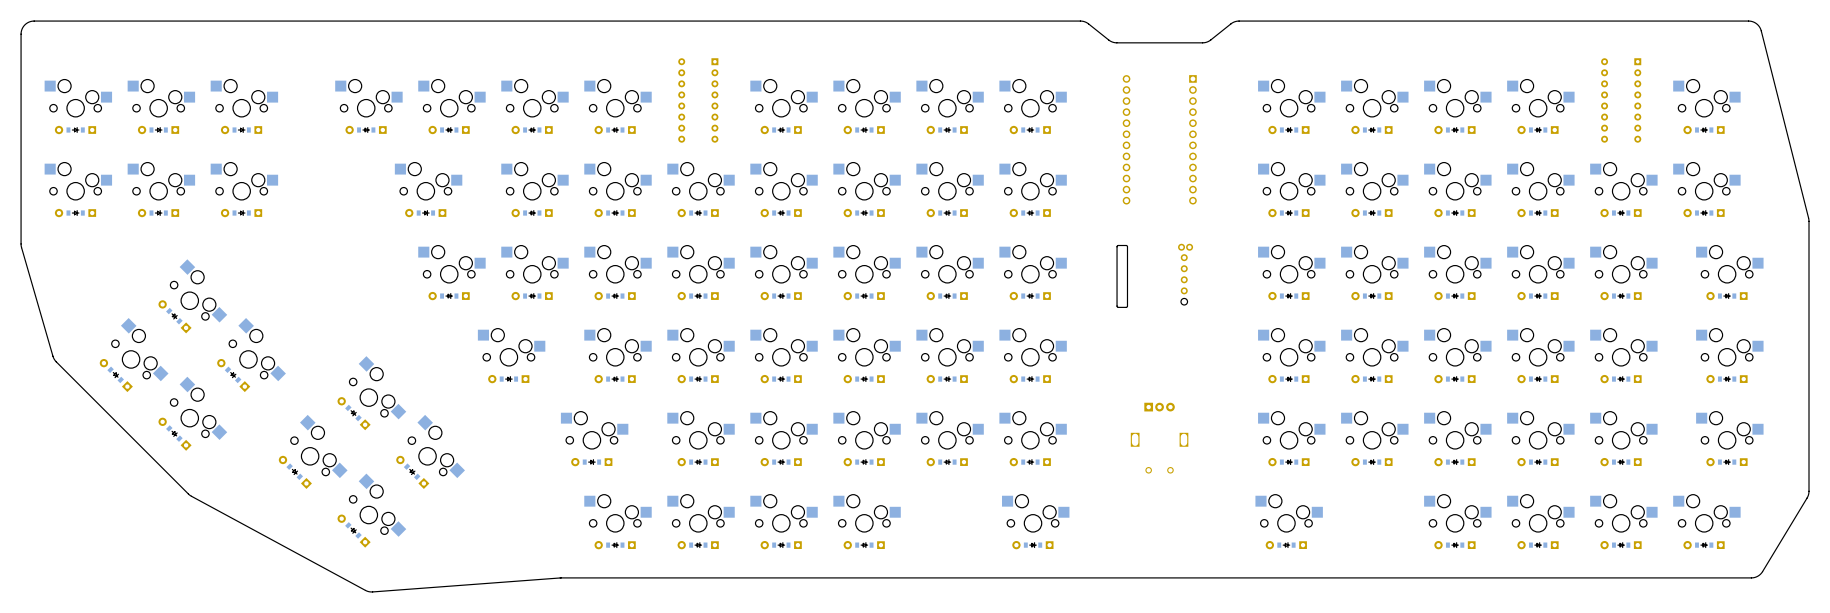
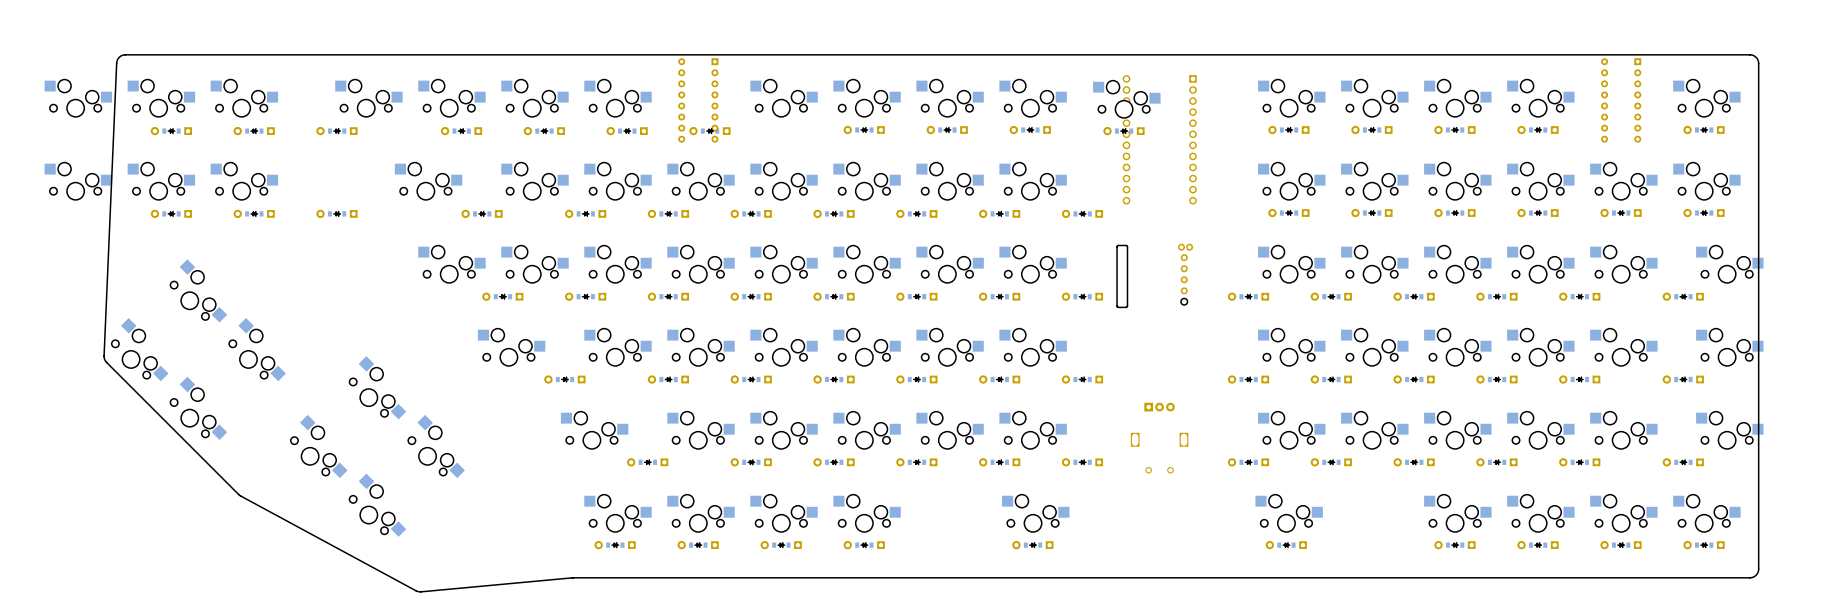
part: none -> (1126, 99)
part: (75, 130) -> none
part position: (158, 130) -> (171, 131)
part position: (241, 130) -> (254, 131)
part position: (366, 130) -> (336, 131)
part position: (449, 130) -> (461, 131)
part position: (532, 130) -> (544, 131)
part position: (615, 130) -> (627, 131)
part: (781, 130) -> none
part: none -> (709, 131)
part: none -> (1123, 131)
part: (75, 213) -> none
part position: (158, 213) -> (171, 213)
part position: (241, 213) -> (254, 213)
part: none -> (336, 213)
part: (425, 213) -> none
part: none -> (482, 213)
part: (532, 213) -> none
part: none -> (585, 213)
part: (615, 213) -> none
part: none -> (668, 213)
part: (698, 213) -> none
part: none -> (751, 213)
part: (781, 213) -> none
part: none -> (834, 213)
part: (864, 213) -> none
part: none -> (916, 213)
part: (947, 213) -> none
part: none -> (999, 213)
part: (1030, 213) -> none
part: none -> (1082, 213)
part: (449, 296) -> none
part: none -> (502, 296)
part: (532, 296) -> none
part: none -> (585, 296)
part: (615, 296) -> none
part: none -> (668, 296)
part: (698, 296) -> none
part: none -> (751, 296)
part: (781, 296) -> none
part: none -> (834, 296)
part: (864, 296) -> none
part: none -> (916, 296)
part: (947, 296) -> none
part: none -> (999, 296)
part: (1030, 296) -> none
part: none -> (1082, 296)
part: none -> (1248, 296)
part: (1288, 296) -> none
part: none -> (1331, 296)
part: (1371, 296) -> none
part: none -> (1414, 296)
part: (1454, 296) -> none
part: none -> (1496, 296)
part: (1538, 296) -> none
part: none -> (1579, 296)
part: (1621, 296) -> none
part: none -> (1683, 296)
part: (1726, 296) -> none
part: (175, 316) -> none
part: (116, 375) -> none
part: (233, 375) -> none
part: (508, 379) -> none
part: none -> (564, 379)
part: (615, 379) -> none
part: none -> (668, 379)
part: (698, 379) -> none
part: none -> (751, 379)
part: (781, 379) -> none
part: none -> (834, 379)
part: (864, 379) -> none
part: none -> (916, 379)
part: (947, 379) -> none
part: none -> (999, 379)
part: (1030, 379) -> none
part: none -> (1082, 379)
part: none -> (1248, 379)
part: (1288, 379) -> none
part: none -> (1331, 379)
part: (1371, 379) -> none
part: none -> (1414, 379)
part: (1454, 379) -> none
part: none -> (1496, 379)
part: (1538, 379) -> none
part: none -> (1579, 379)
part: (1621, 379) -> none
part: none -> (1683, 379)
part: (1726, 379) -> none
part: (354, 413) -> none
part: (175, 434) -> none
part: (591, 462) -> none
part: none -> (647, 462)
part: (698, 462) -> none
part: none -> (751, 462)
part: (781, 462) -> none
part: none -> (834, 462)
part: (864, 462) -> none
part: none -> (916, 462)
part: (947, 462) -> none
part: none -> (999, 462)
part: (1030, 462) -> none
part: none -> (1082, 462)
part: none -> (1248, 462)
part: (1288, 462) -> none
part: none -> (1331, 462)
part: (1371, 462) -> none
part: none -> (1414, 462)
part: (1454, 462) -> none
part: none -> (1496, 462)
part: (1538, 462) -> none
part: none -> (1579, 462)
part: (1621, 462) -> none
part: none -> (1683, 462)
part: (1726, 462) -> none
part: (295, 472) -> none
part: (412, 472) -> none
part: (354, 531) -> none
board edge: (1751, 577) (1757, 576) (1762, 571) (1807, 498) (1809, 491) (1808, 219) (1761, 30) (1758, 25) (1752, 21) (1239, 21) (1232, 23) (1209, 40) (1202, 42) (1113, 42) (1087, 23) (1080, 21) (34, 21) (26, 23) (21, 30) (21, 244) (54, 359) (189, 495) (367, 591) (561, 577) (1751, 577) -> (1749, 54) (1756, 57) (1758, 63) (1758, 569) (1756, 575) (1751, 577) (573, 577) (419, 591) (239, 495) (106, 362) (104, 357) (116, 63) (119, 57) (124, 54) (1749, 54)

